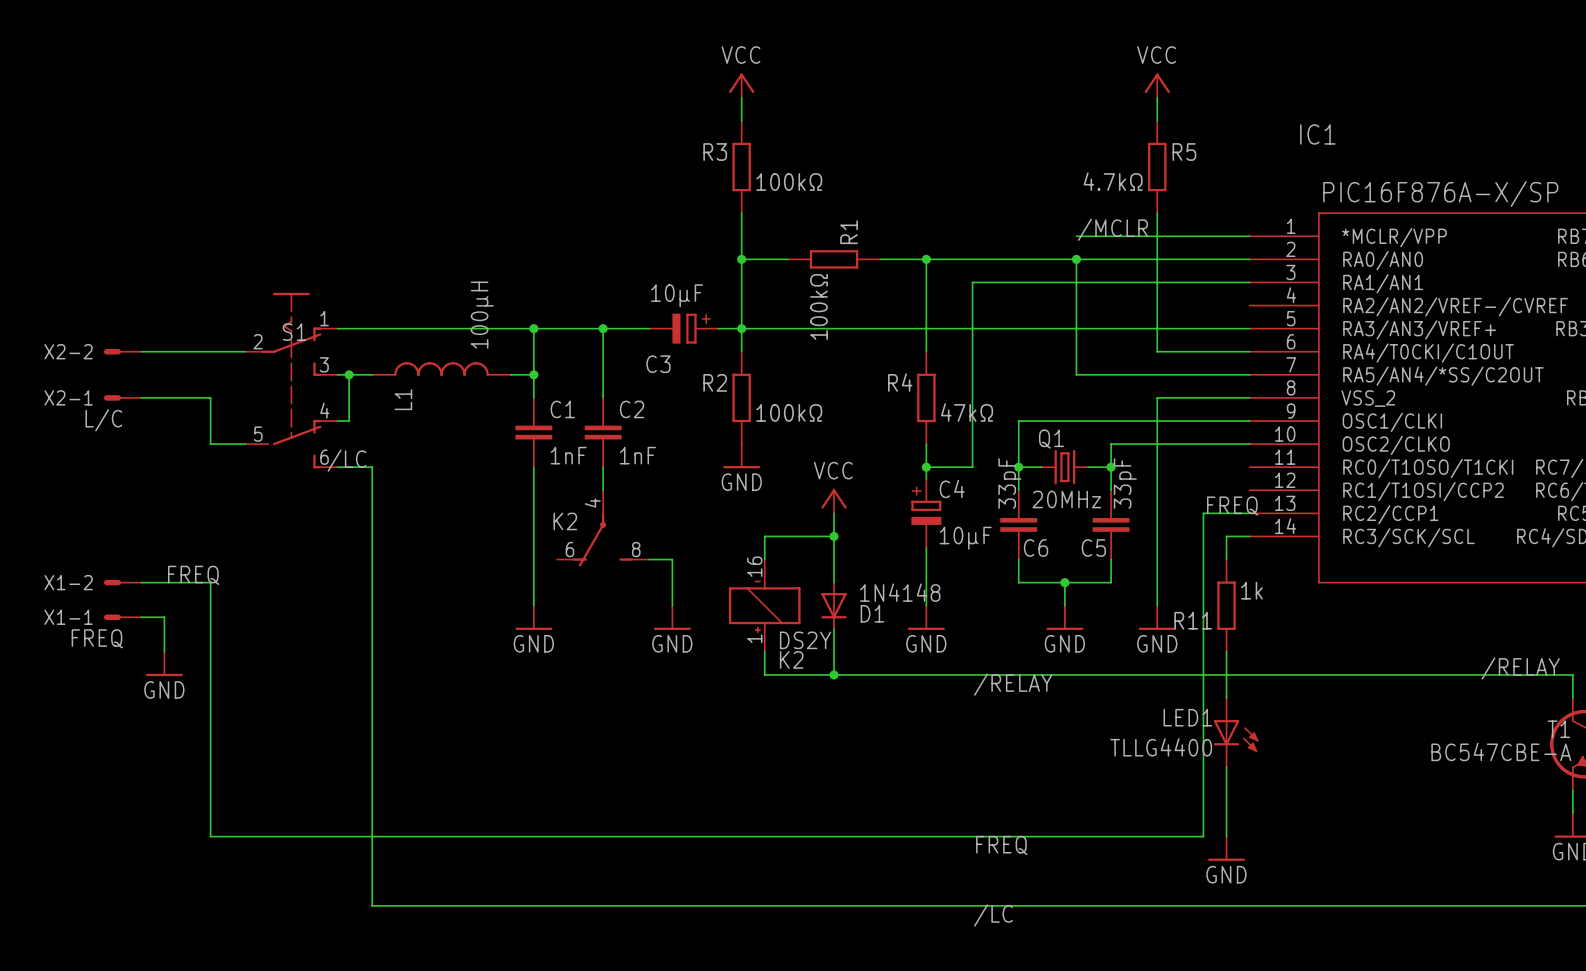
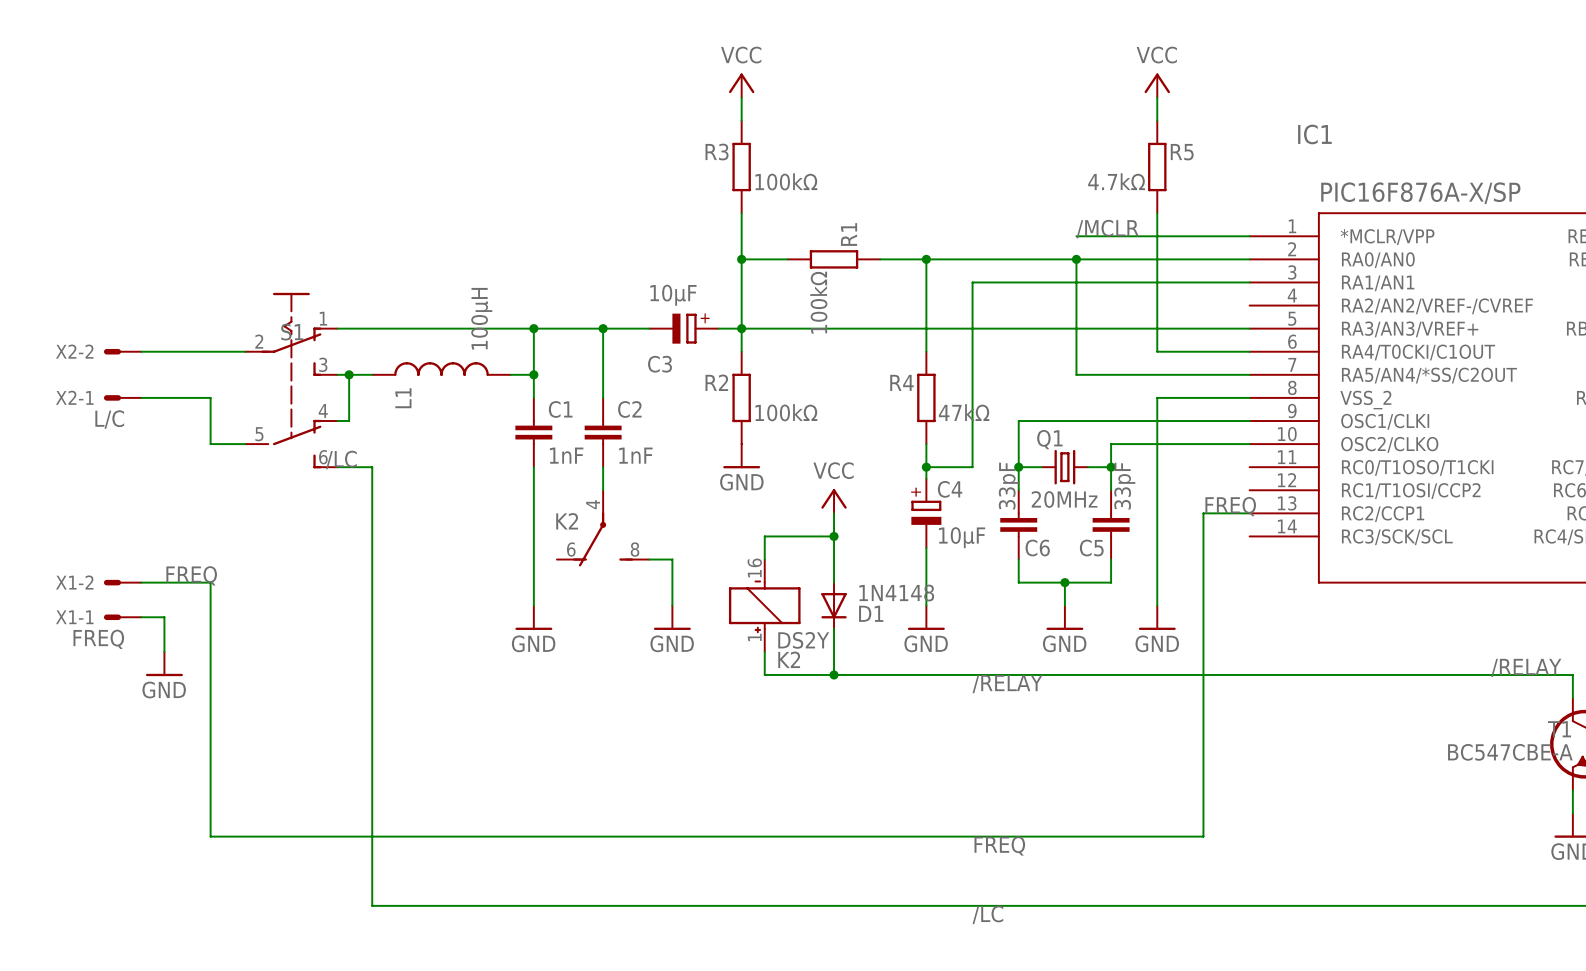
wire: (1249, 536) (1226, 536) (1226, 559) -> none
R11: 1k (1226, 605) -> none
wire: (1226, 651) (1226, 698) -> none
LED1: TLLG4400 (1236, 732) -> none
wire: (1226, 767) (1226, 836) -> none
power symbol: GND (1226, 848) -> none

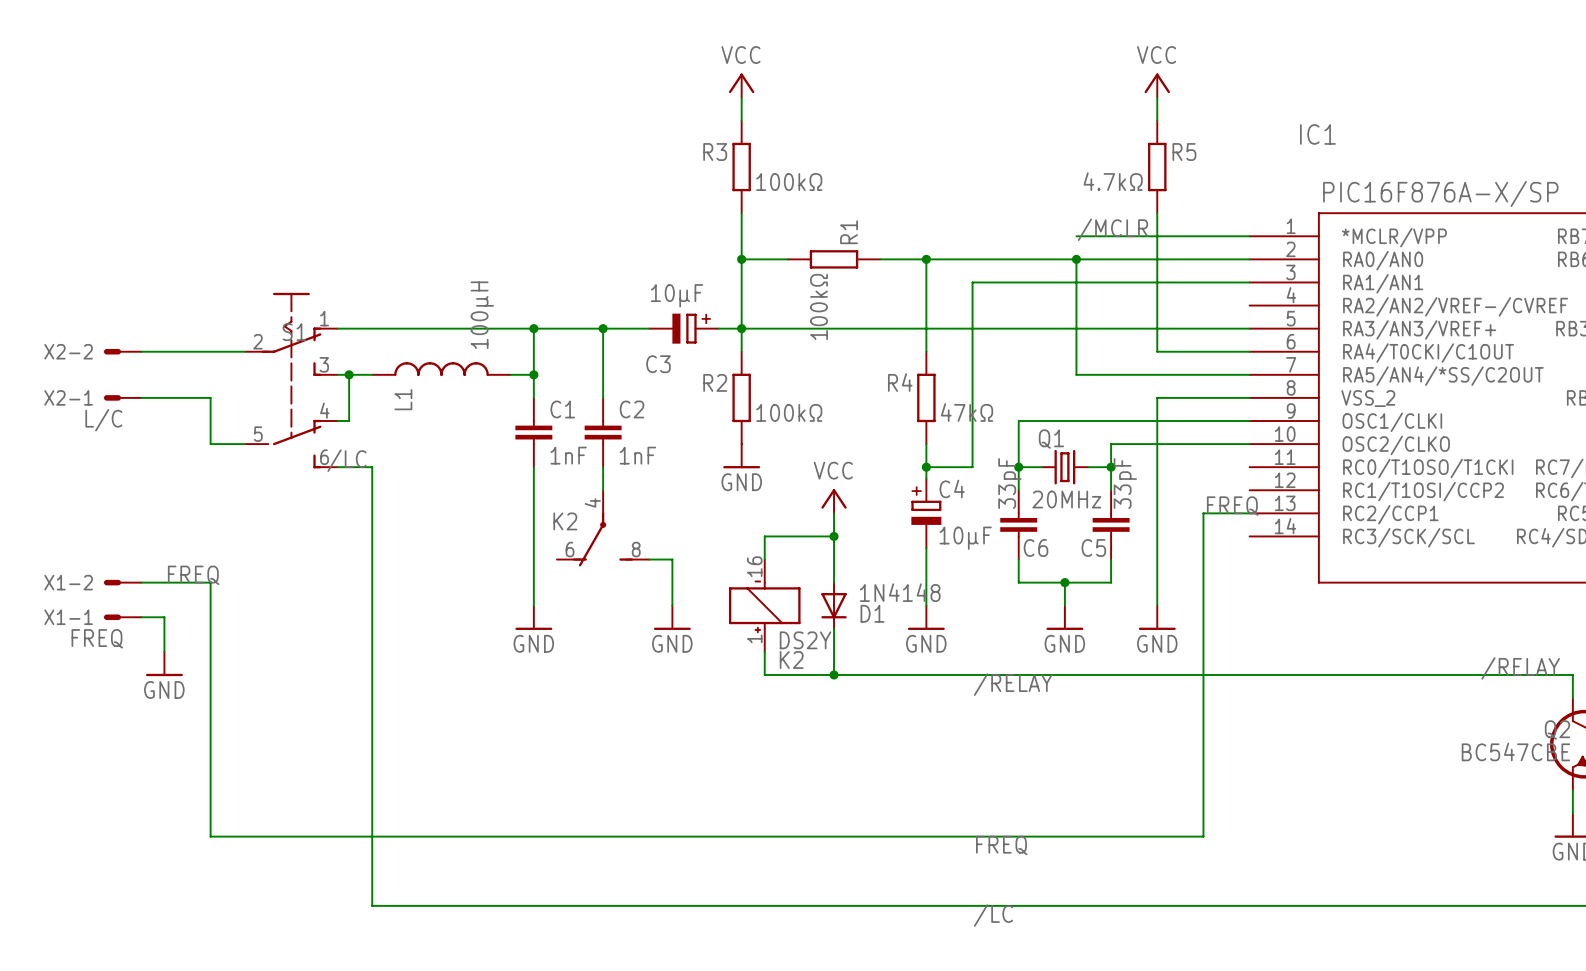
T1 name: T1 (1559, 729) -> Q2 (1557, 730)
T1 value: BC547CBE-A (1510, 752) -> BC547CBE (1515, 751)

